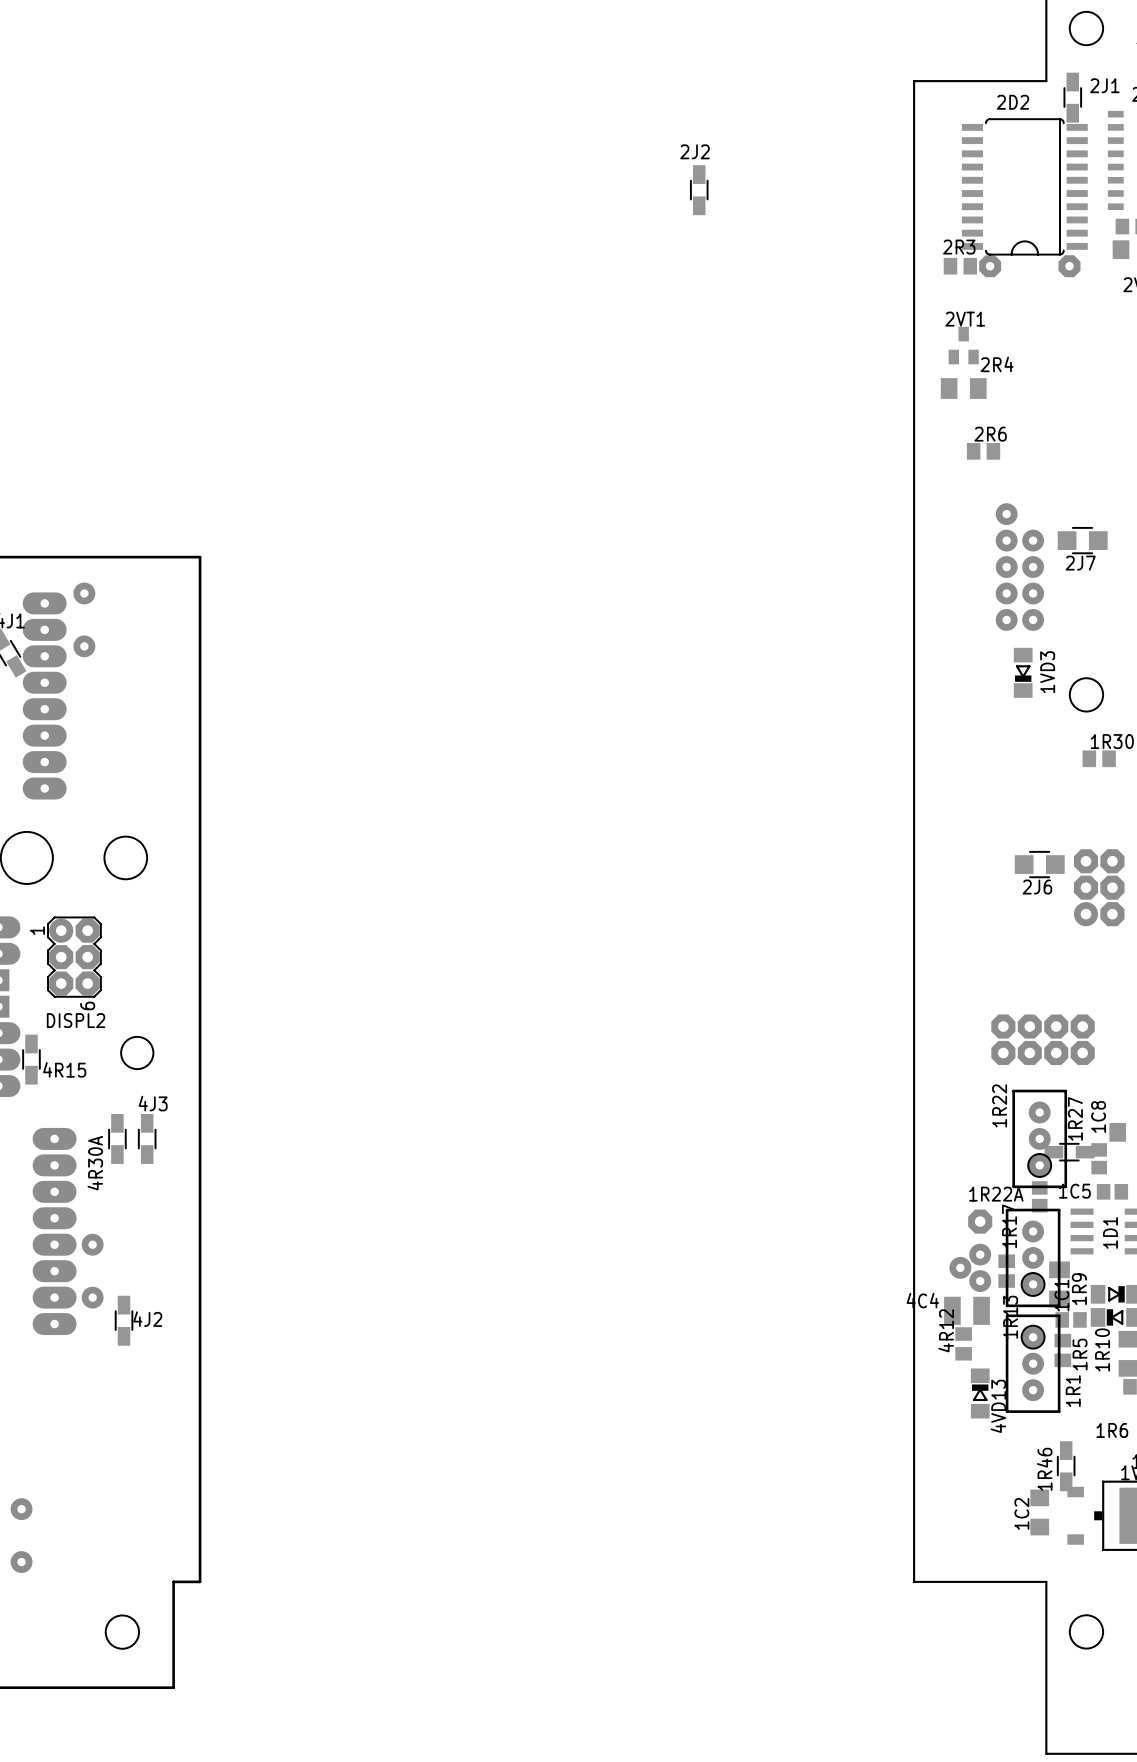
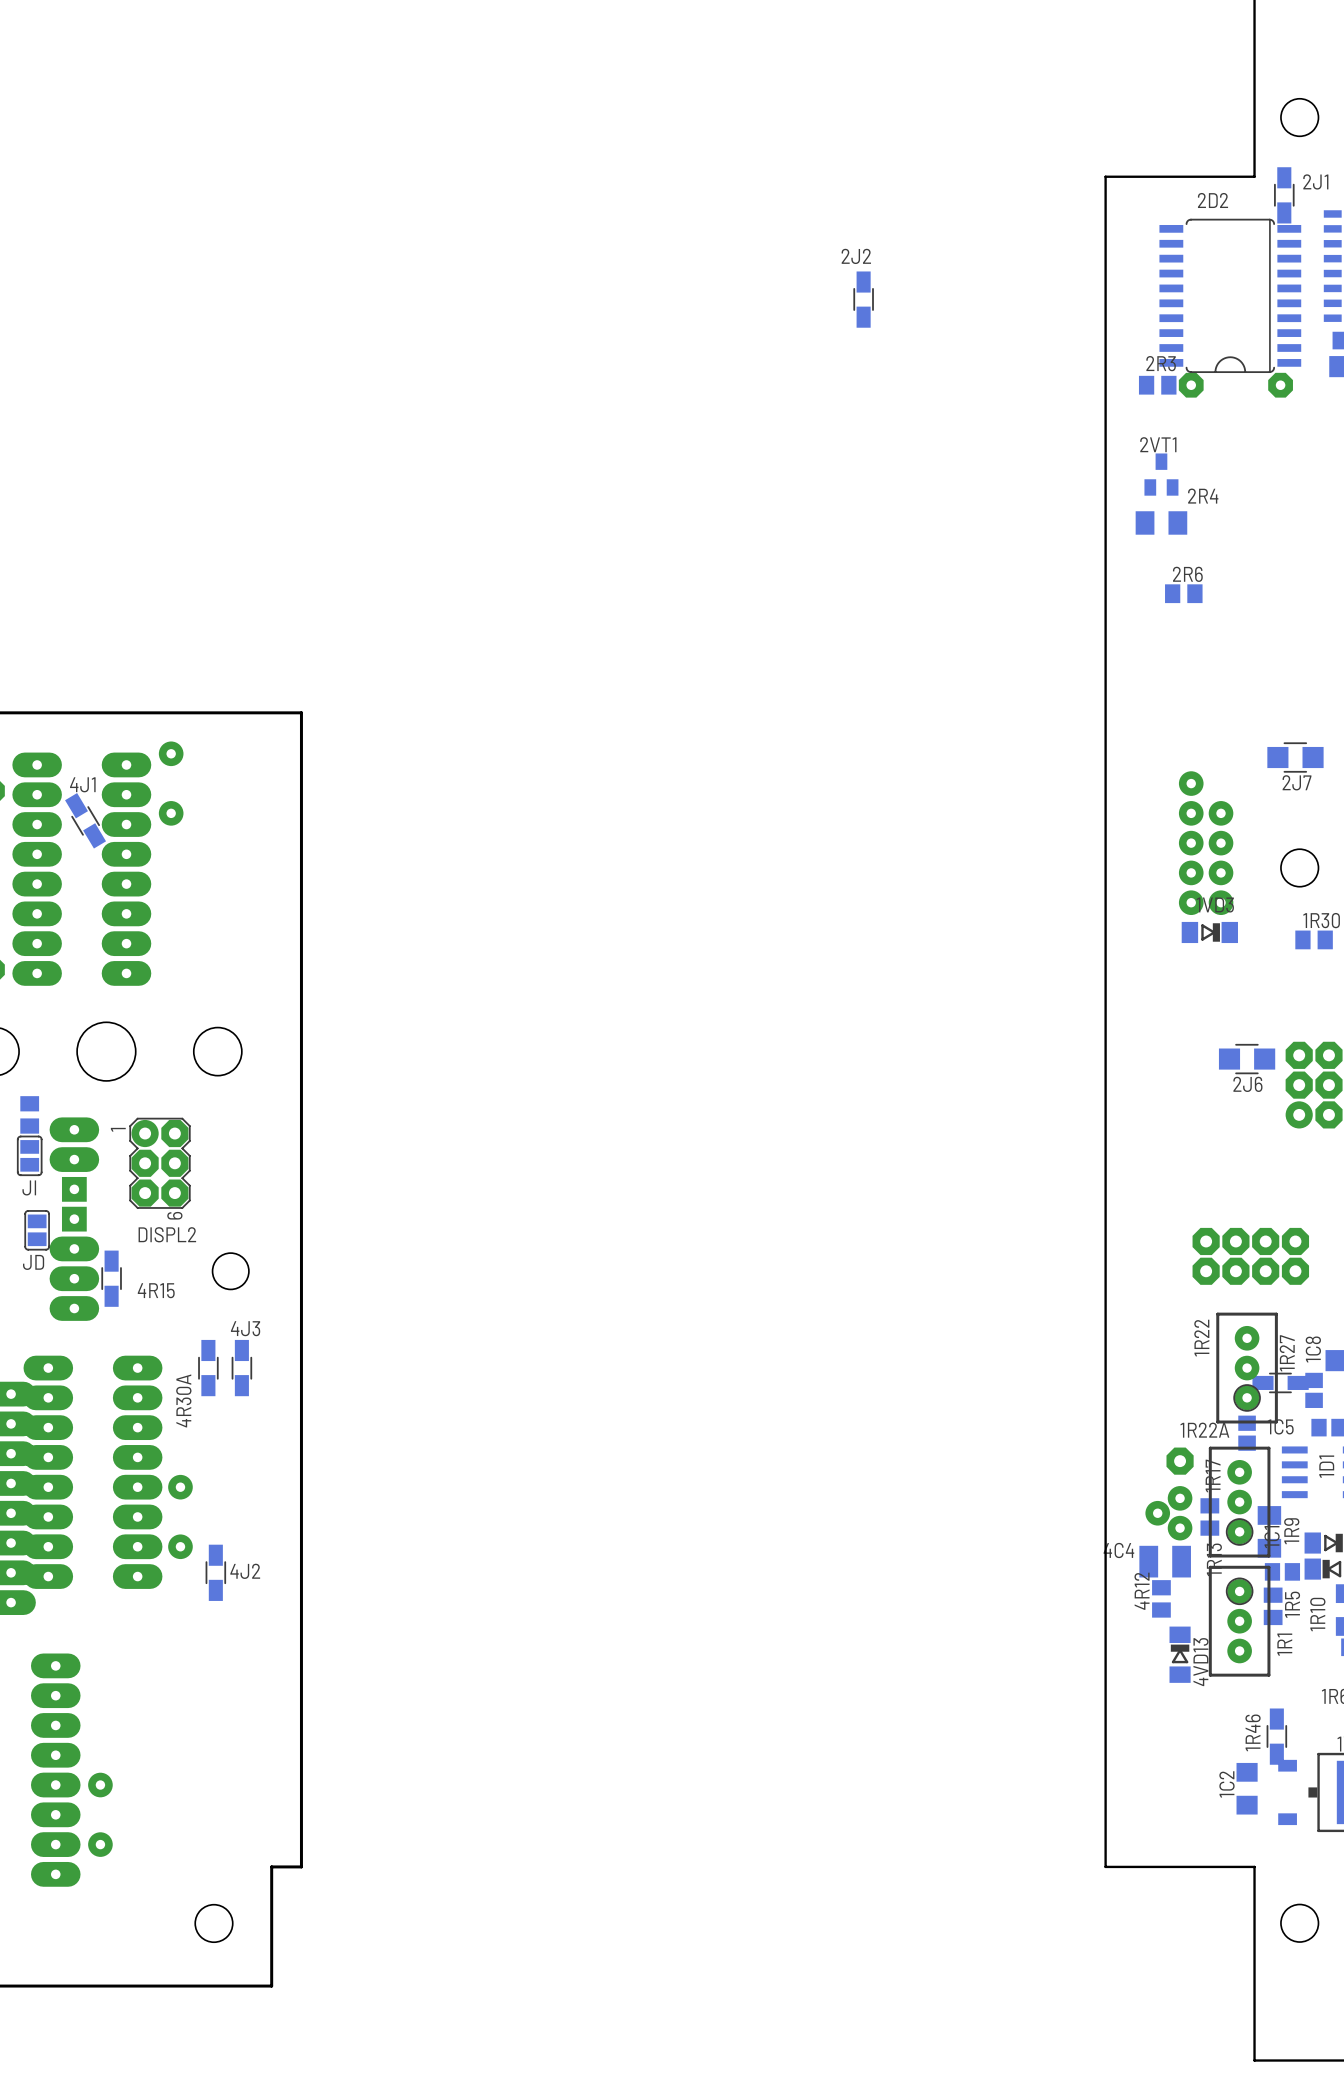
2J7 position: (1082, 540) -> (1295, 757)
part position: (1019, 567) -> (1206, 843)
1VD3 rotation: 0° (1023, 672) -> 90° counterclockwise (1209, 932)
1VD3 position: (1023, 672) -> (1209, 932)

